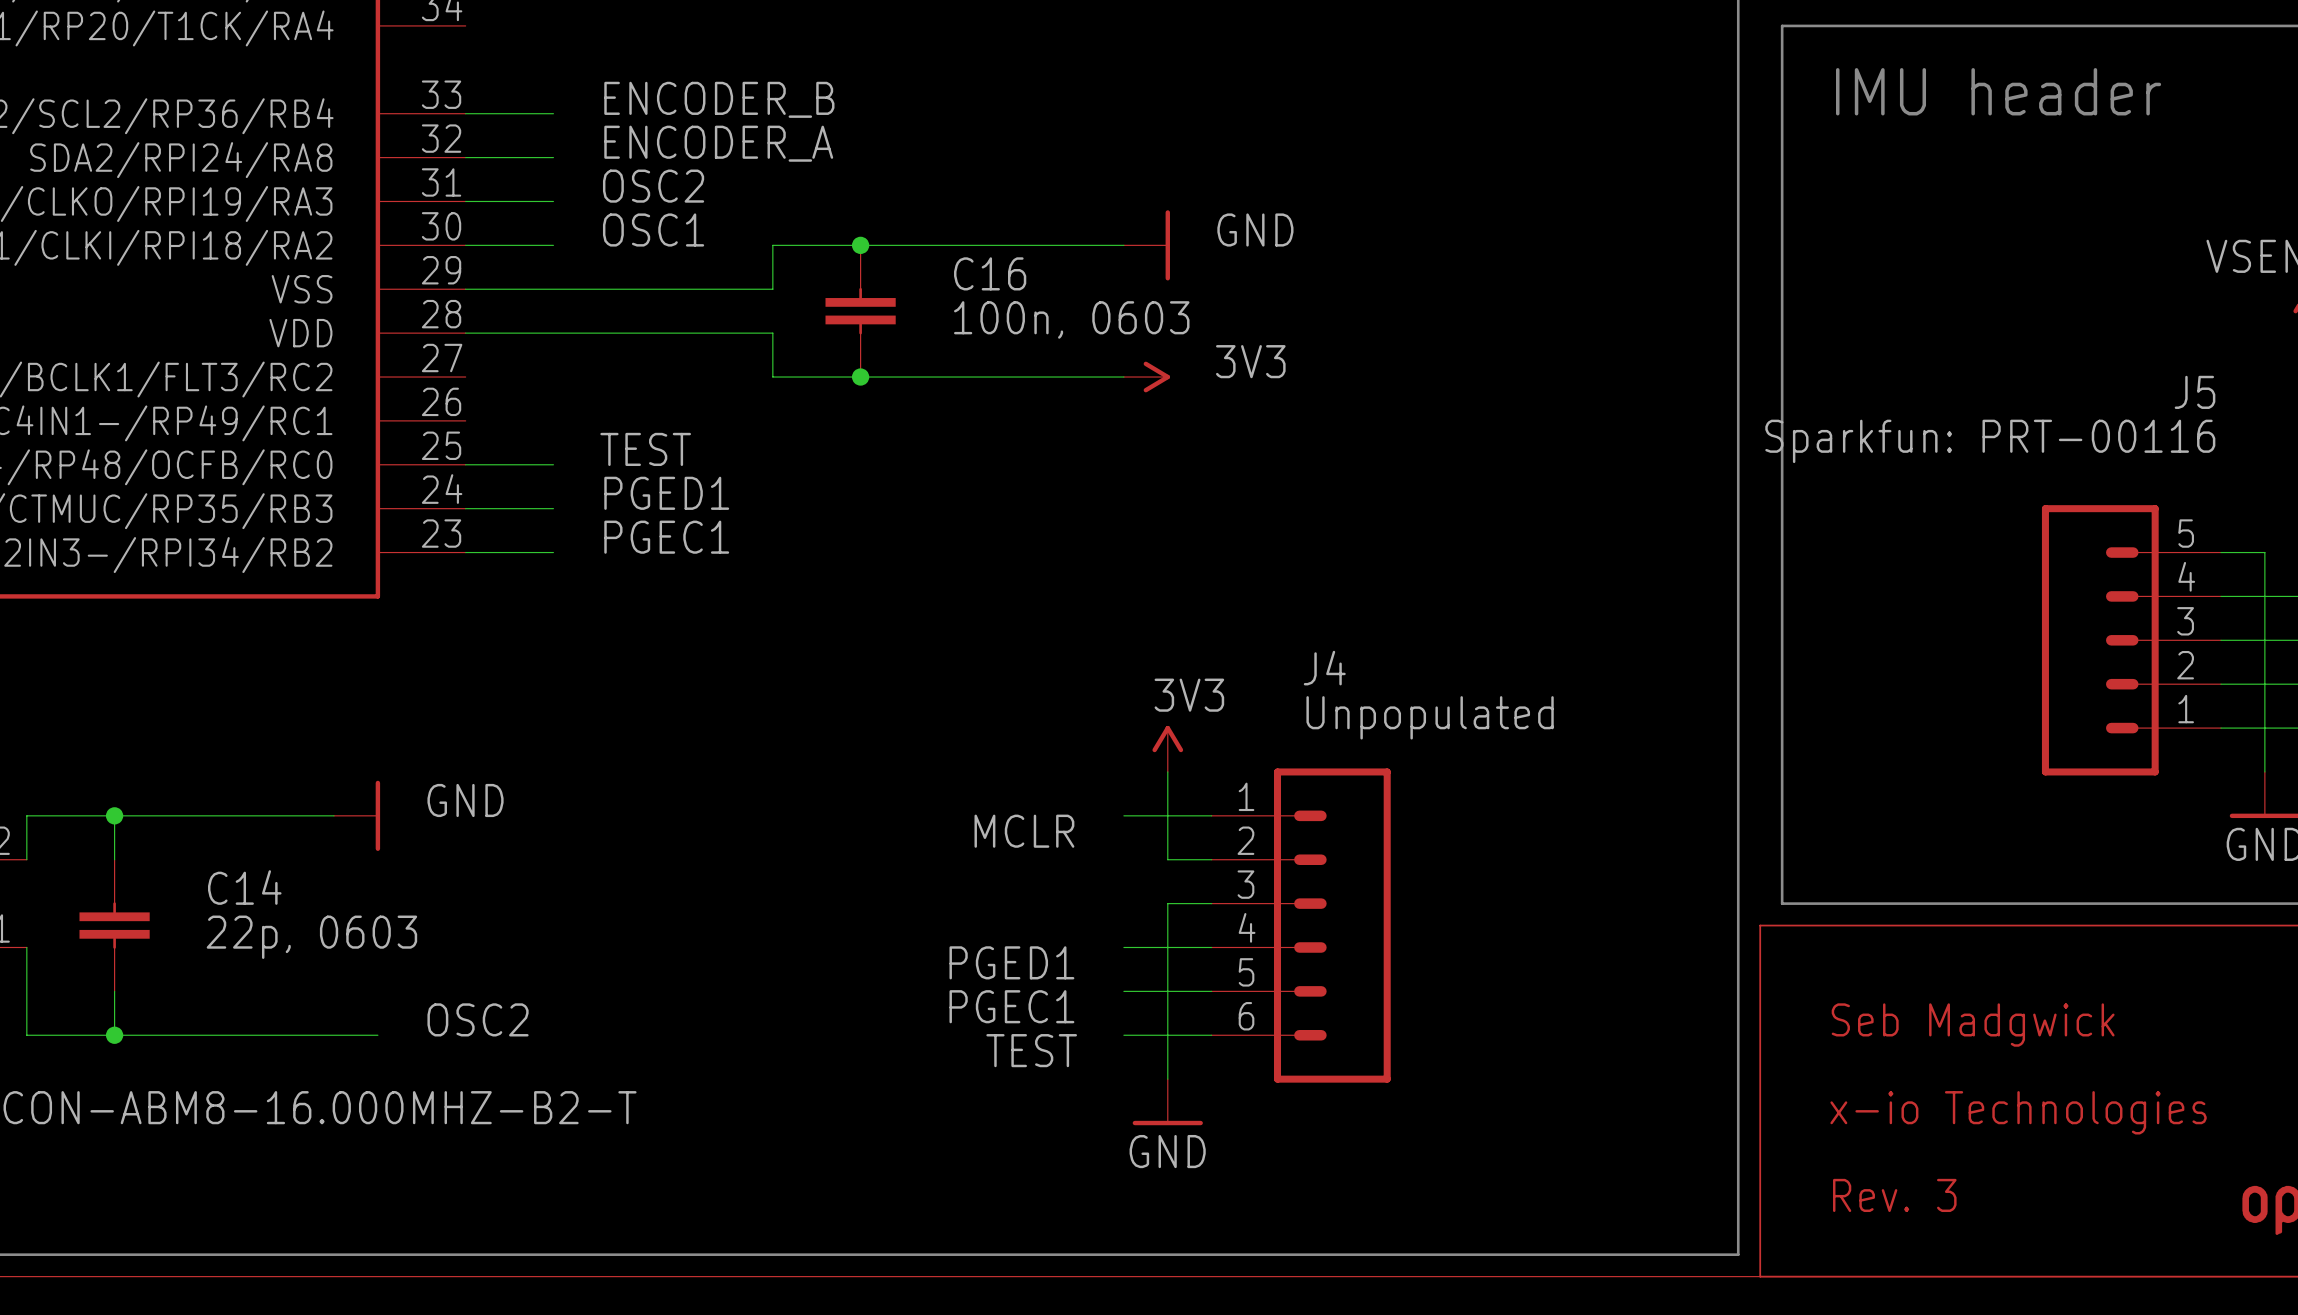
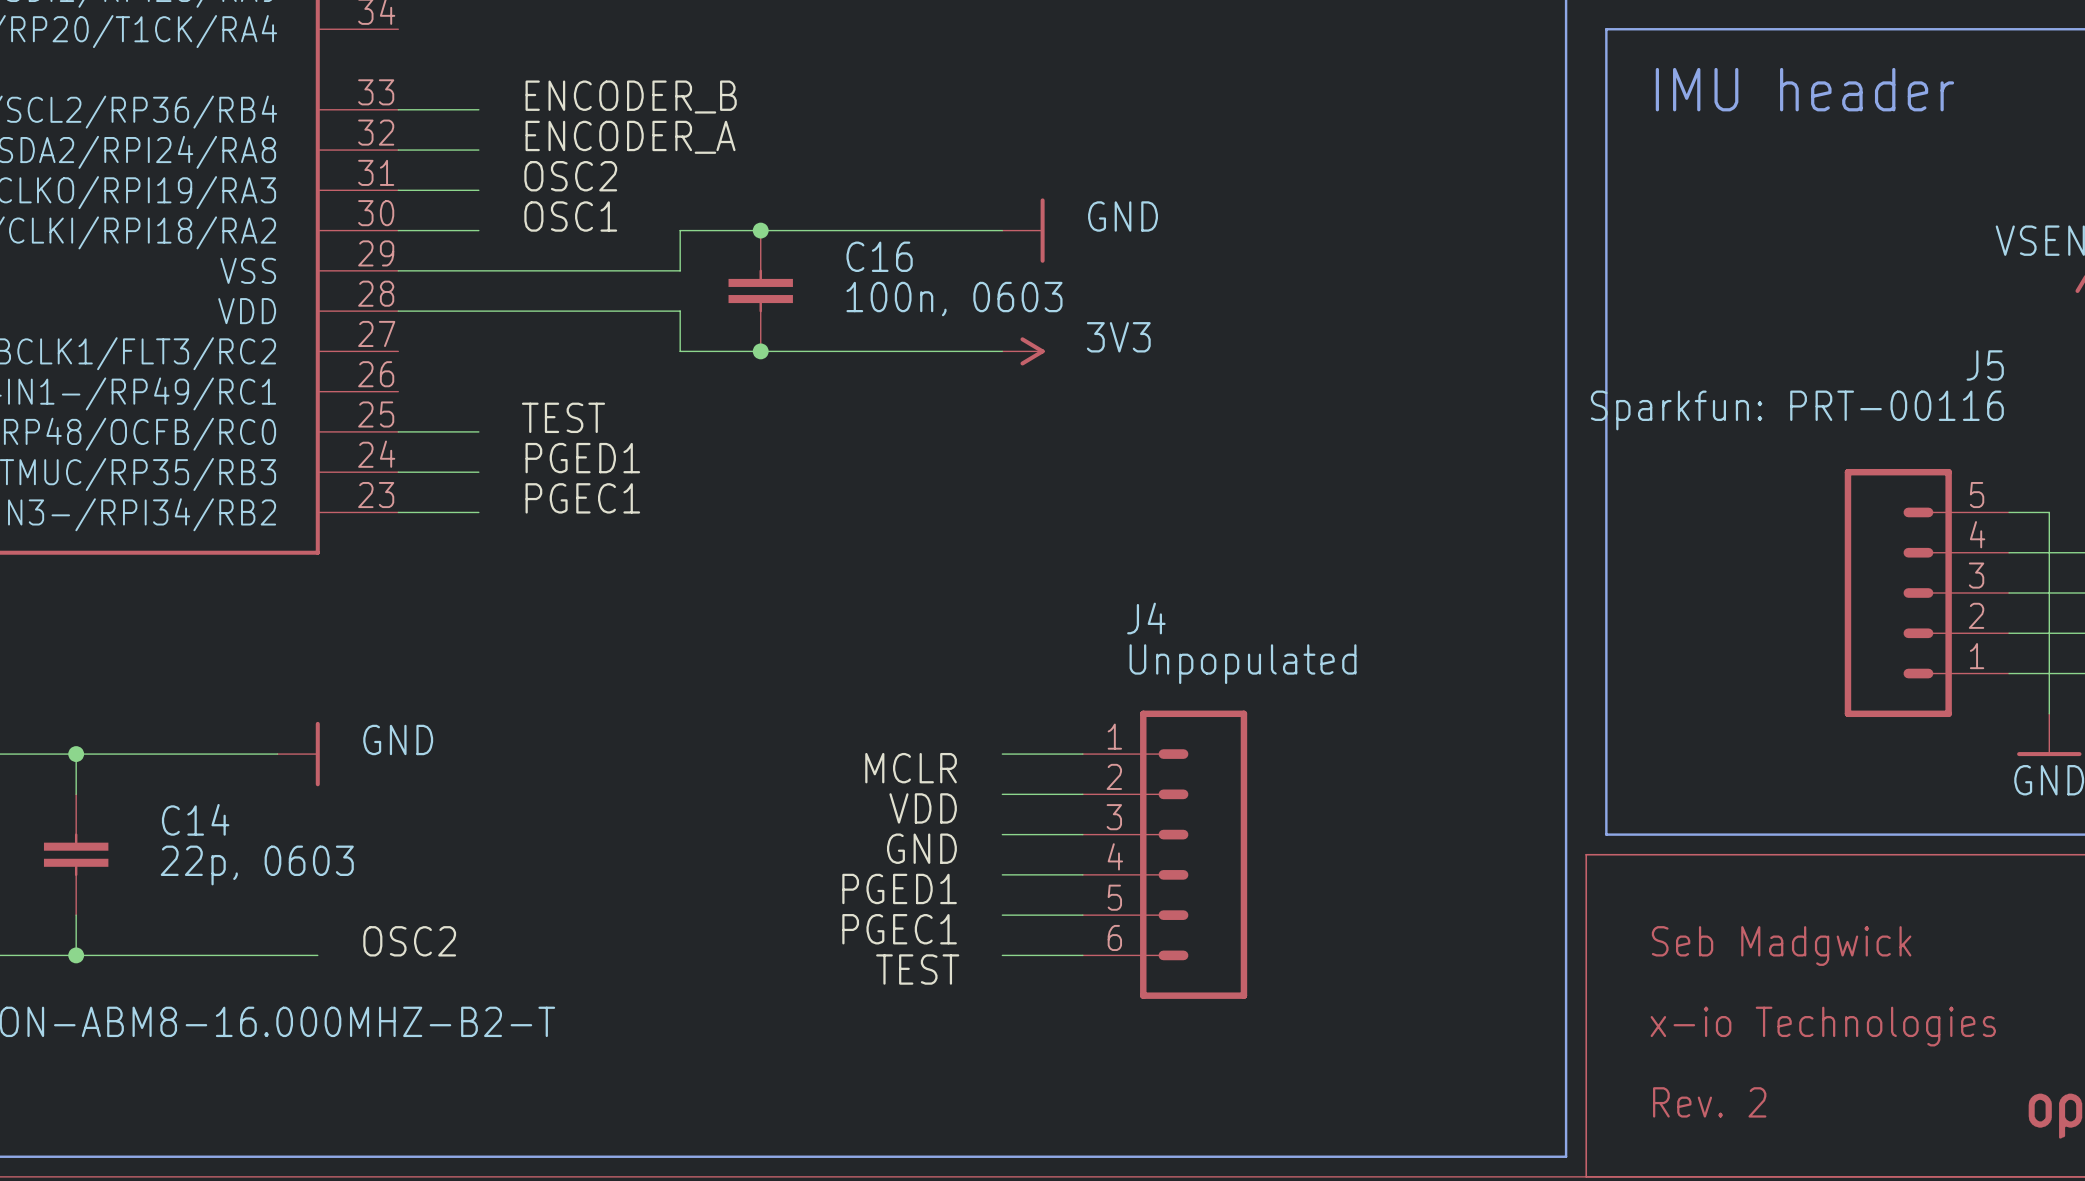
J4 name position: J4 (1324, 668) -> J4 (1146, 618)
J4 value position: Unpopulated (1430, 717) -> Unpopulated (1243, 664)
power symbol: 3V3 (1167, 748) -> none
wire: (1167, 771) (1167, 859) -> (1002, 794) (1042, 794)
label: none -> VDD (923, 808)
wire: (1167, 903) (1167, 1079) -> (1042, 834) (1002, 834)
label: none -> GND (921, 848)
power symbol: GND (1167, 1102) -> none
text: Rev. 3 (1894, 1195) -> Rev. 2 (1709, 1102)

